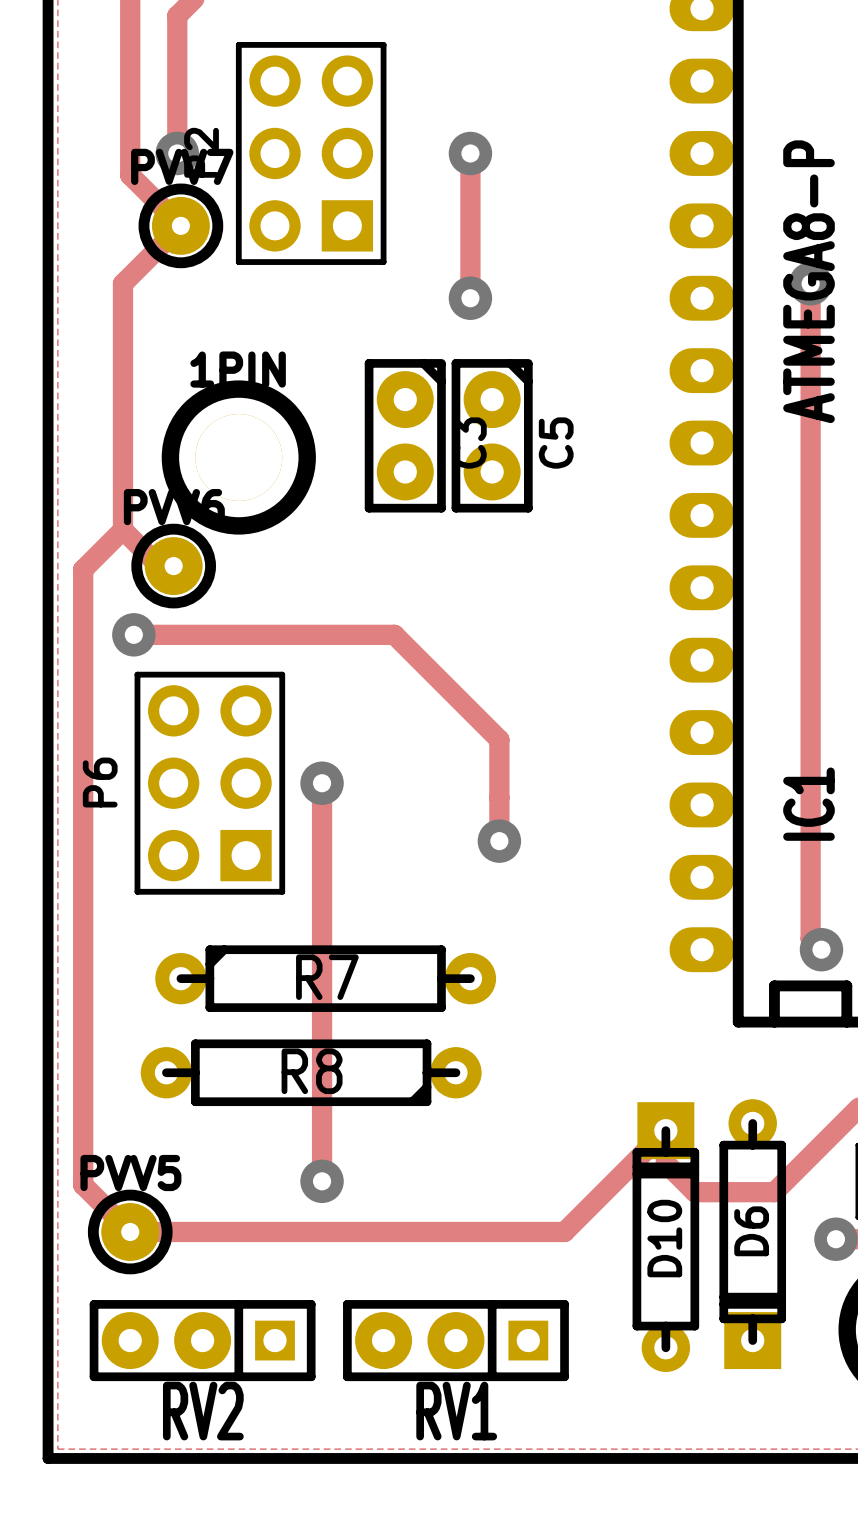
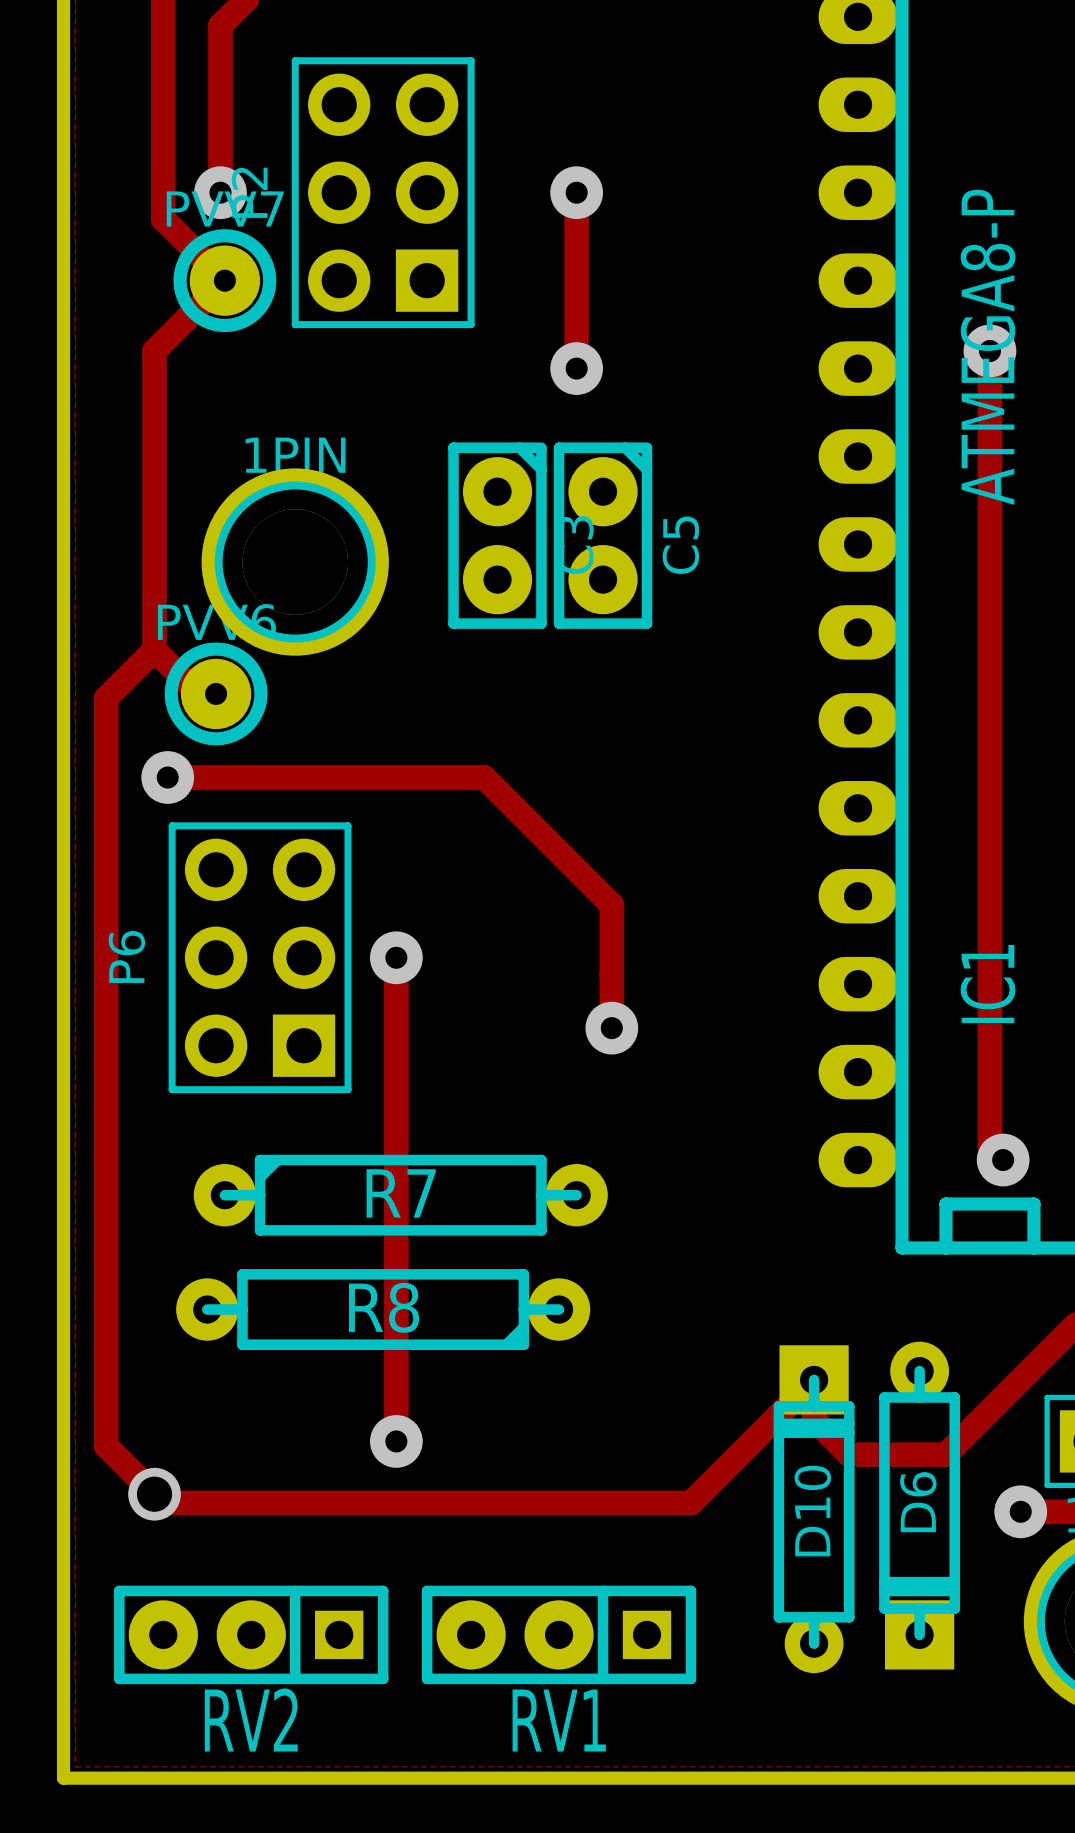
via: none -> (154, 1494)
PVV5: (130, 1231) -> none

